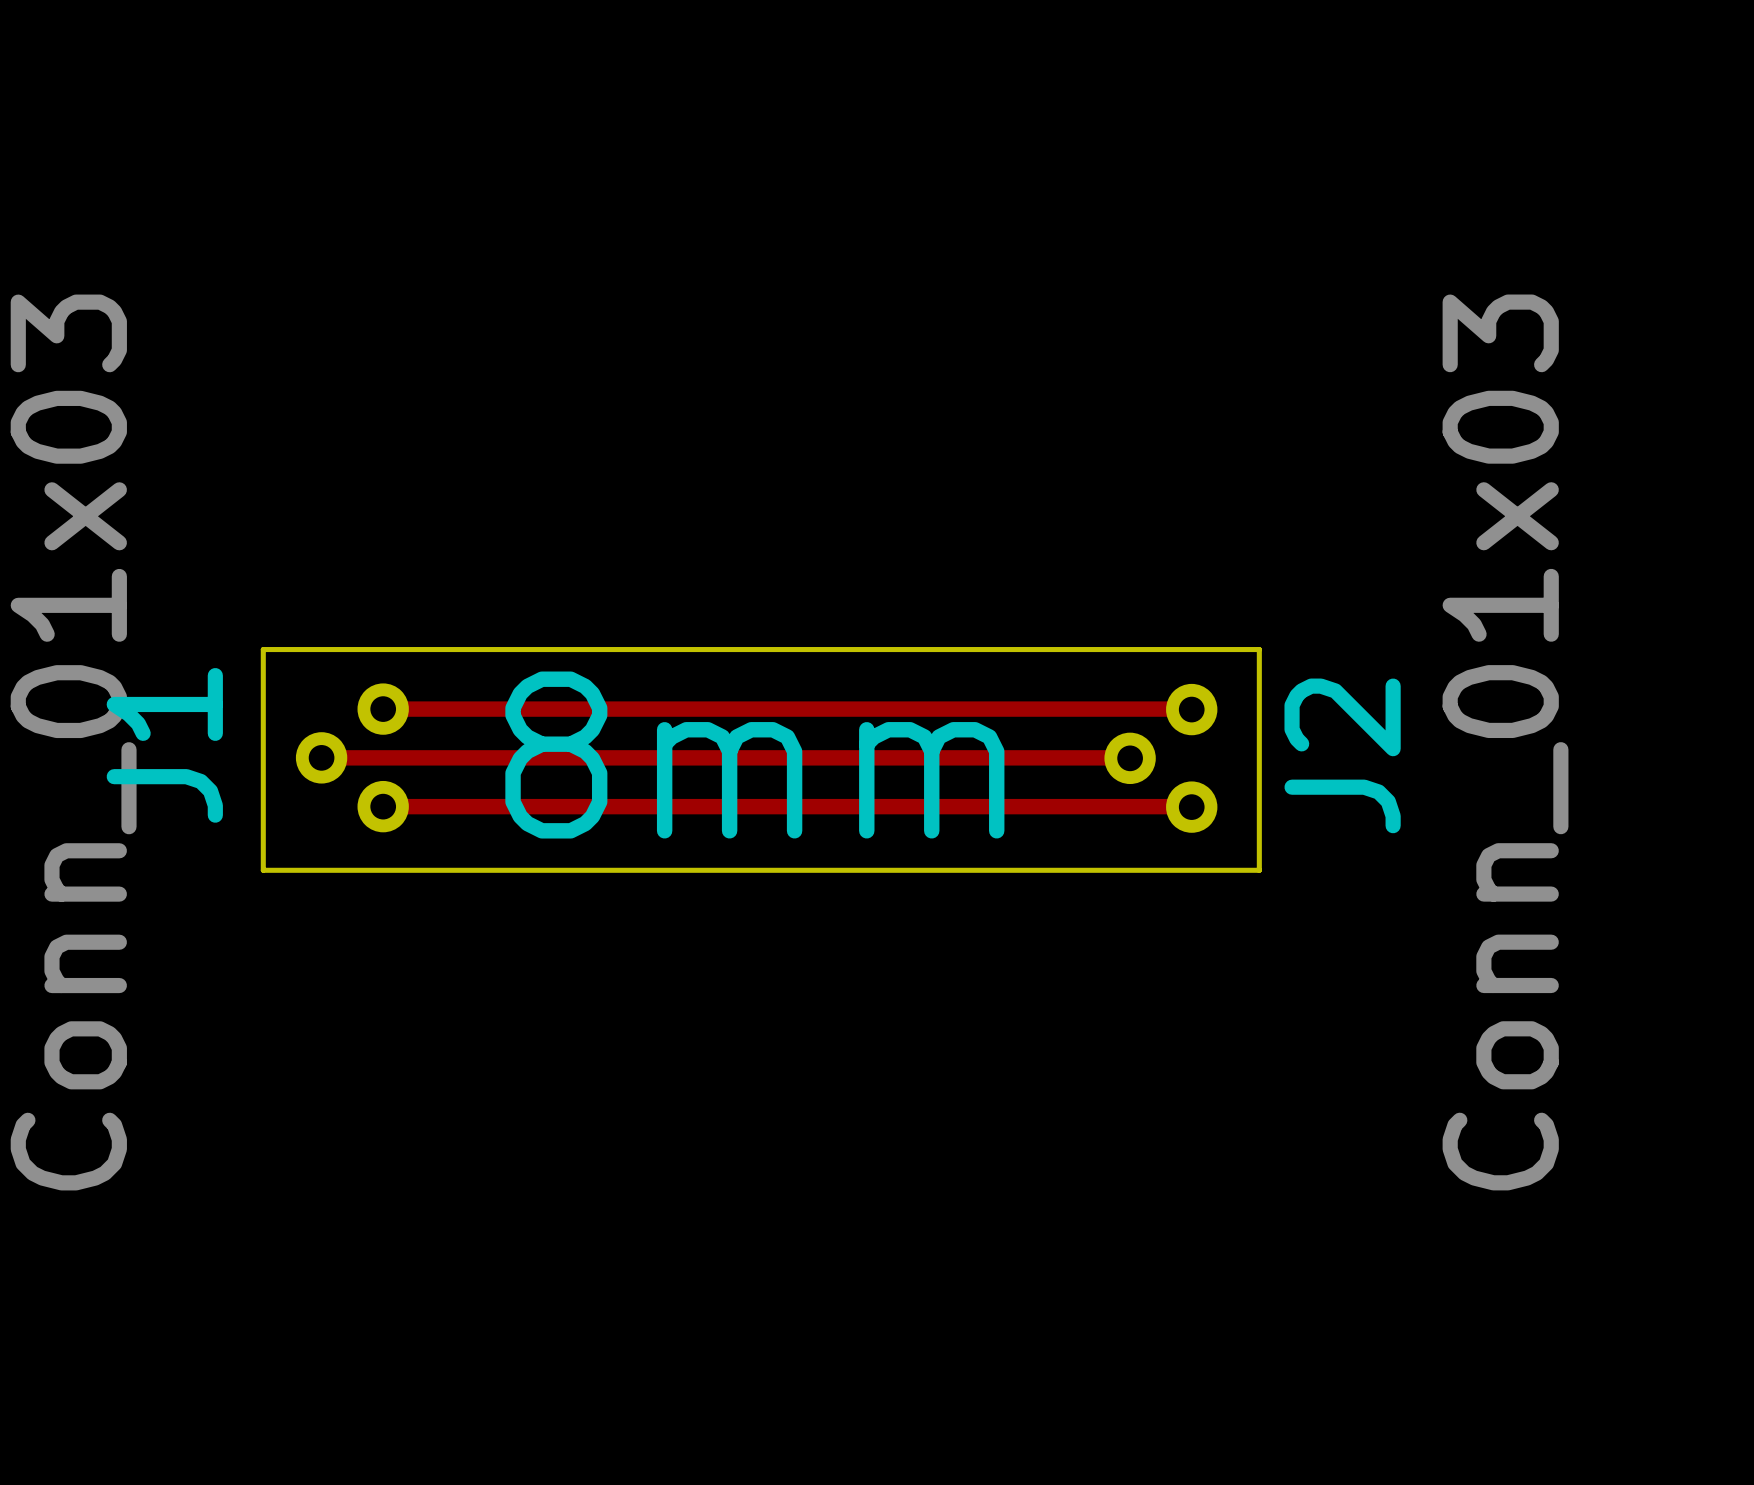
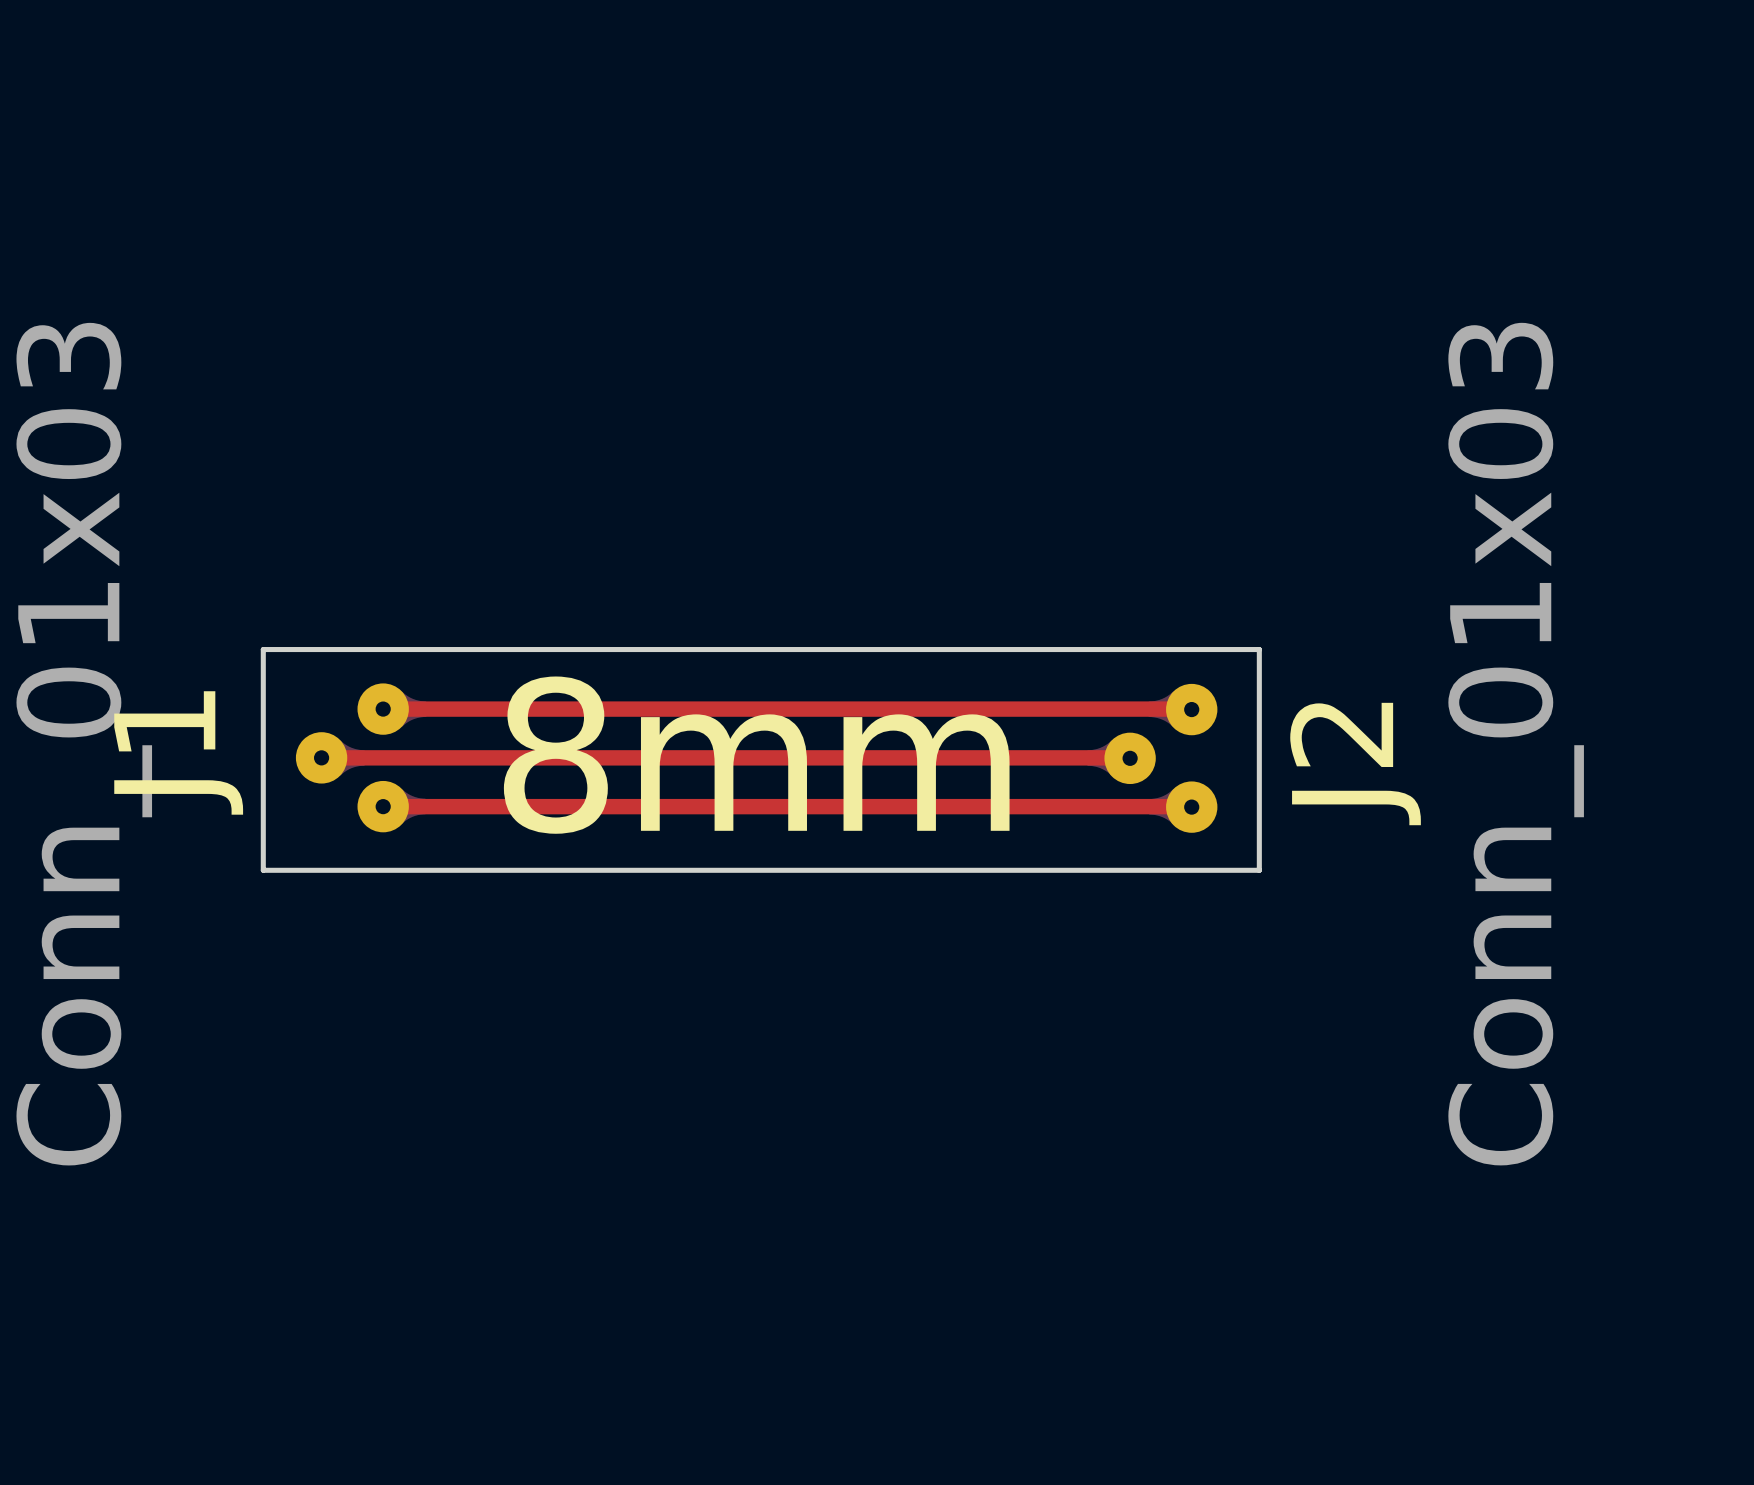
J1 footprint: [295, 683, 409, 833] -> [295, 683, 409, 833]
J2 footprint: [1104, 683, 1218, 833] -> [1104, 683, 1218, 833]

